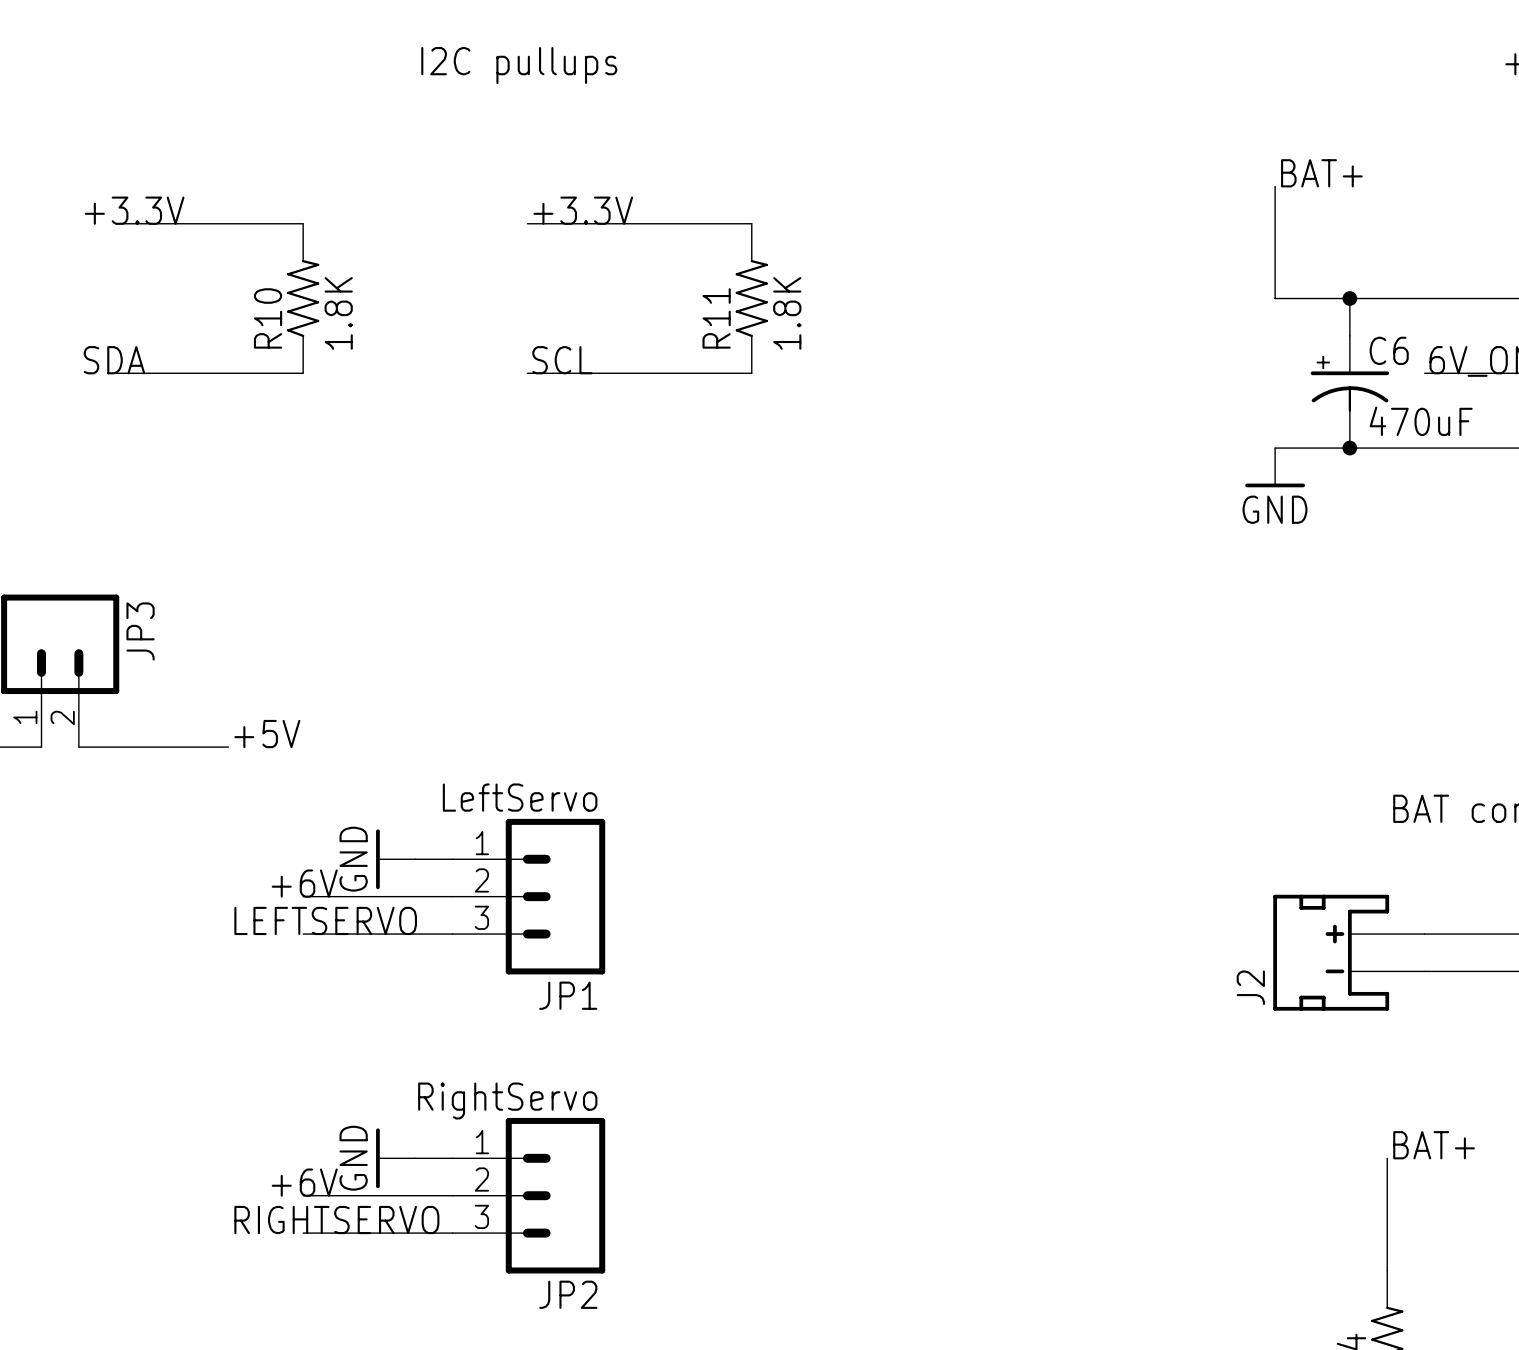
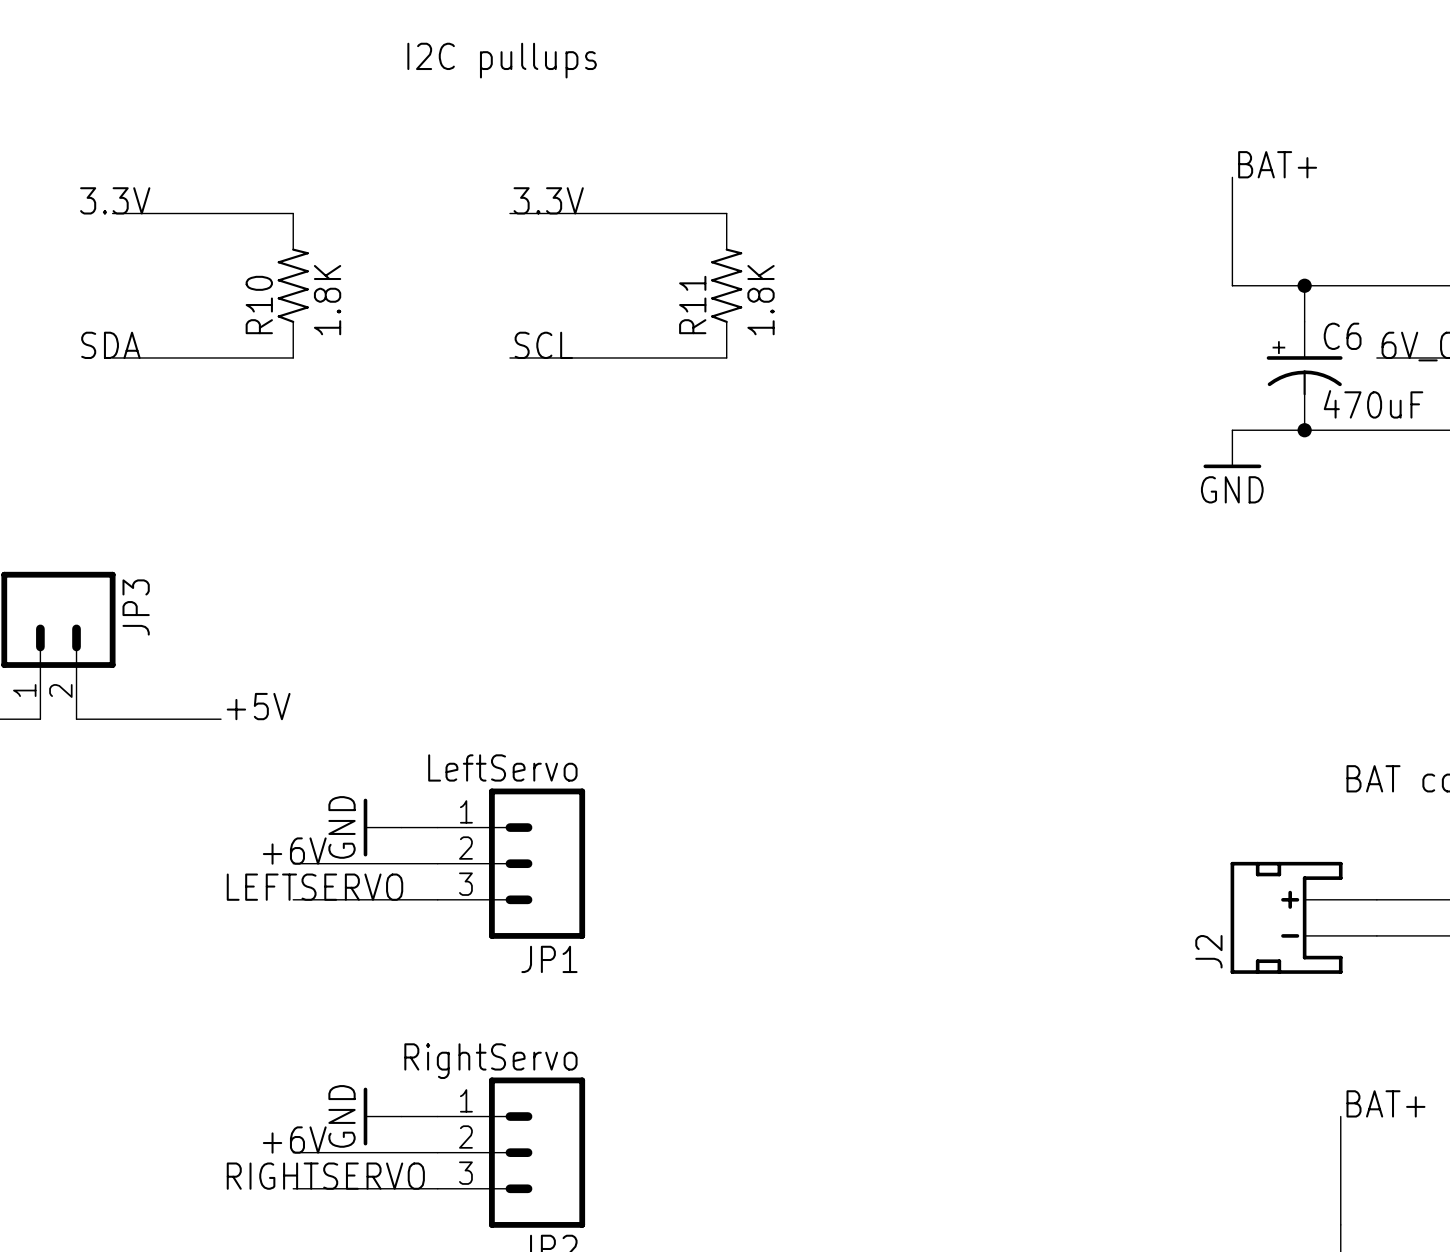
label: +3.3V (134, 210) -> 3.3V (115, 200)
label: +3.3V (583, 210) -> 3.3V (548, 200)

